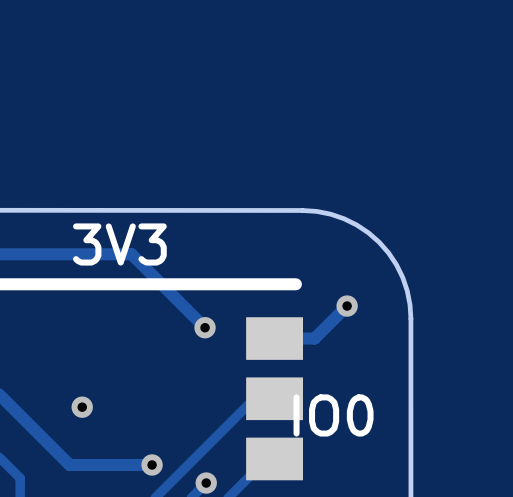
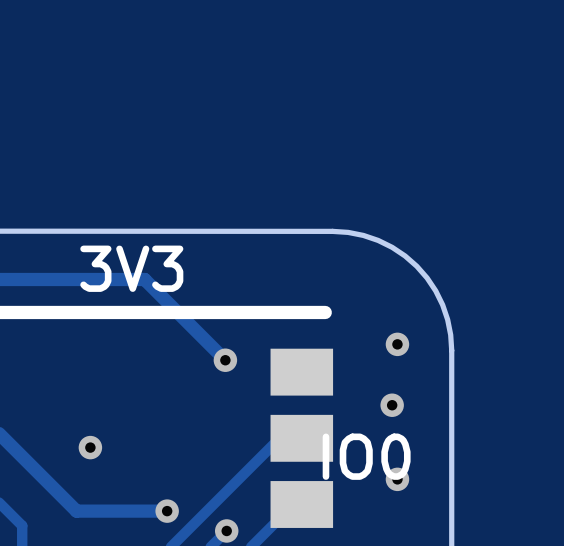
track: (347, 306) (314, 338) (274, 338) -> none
via position: (347, 306) -> (397, 344)
via: none -> (392, 405)
via: none -> (397, 479)

